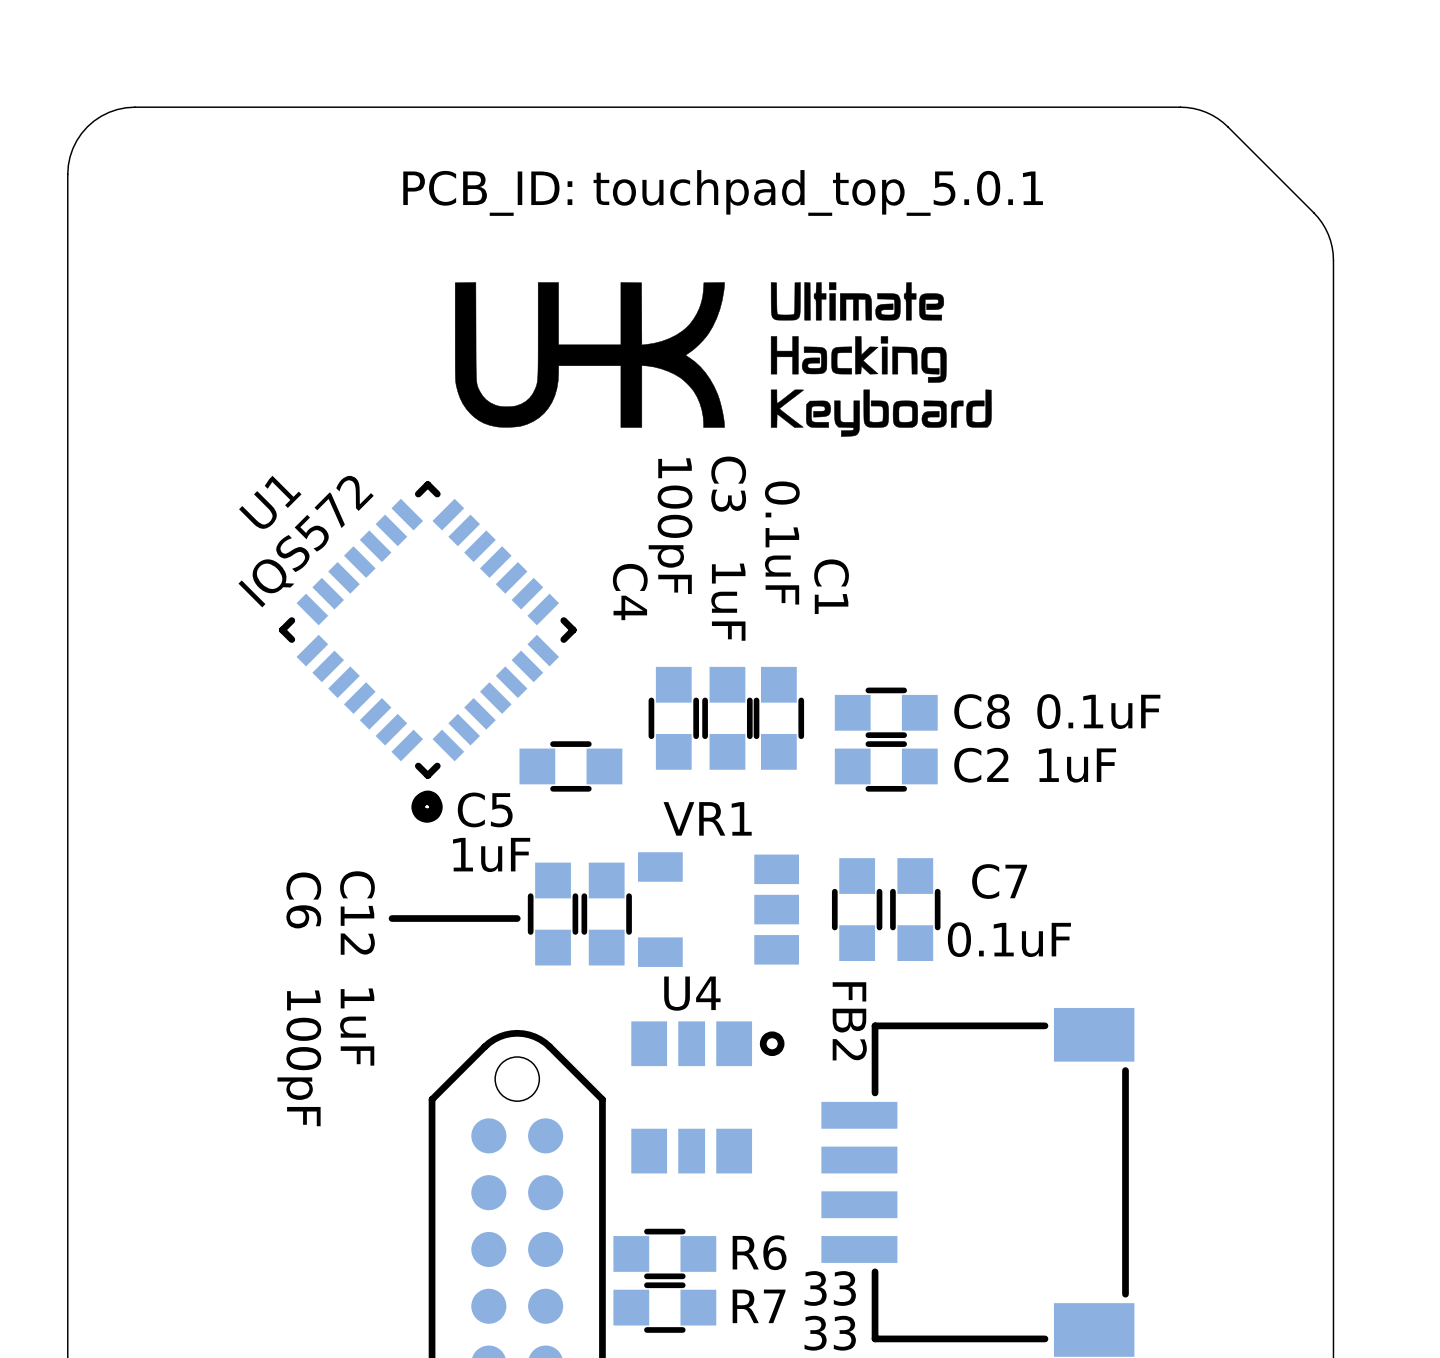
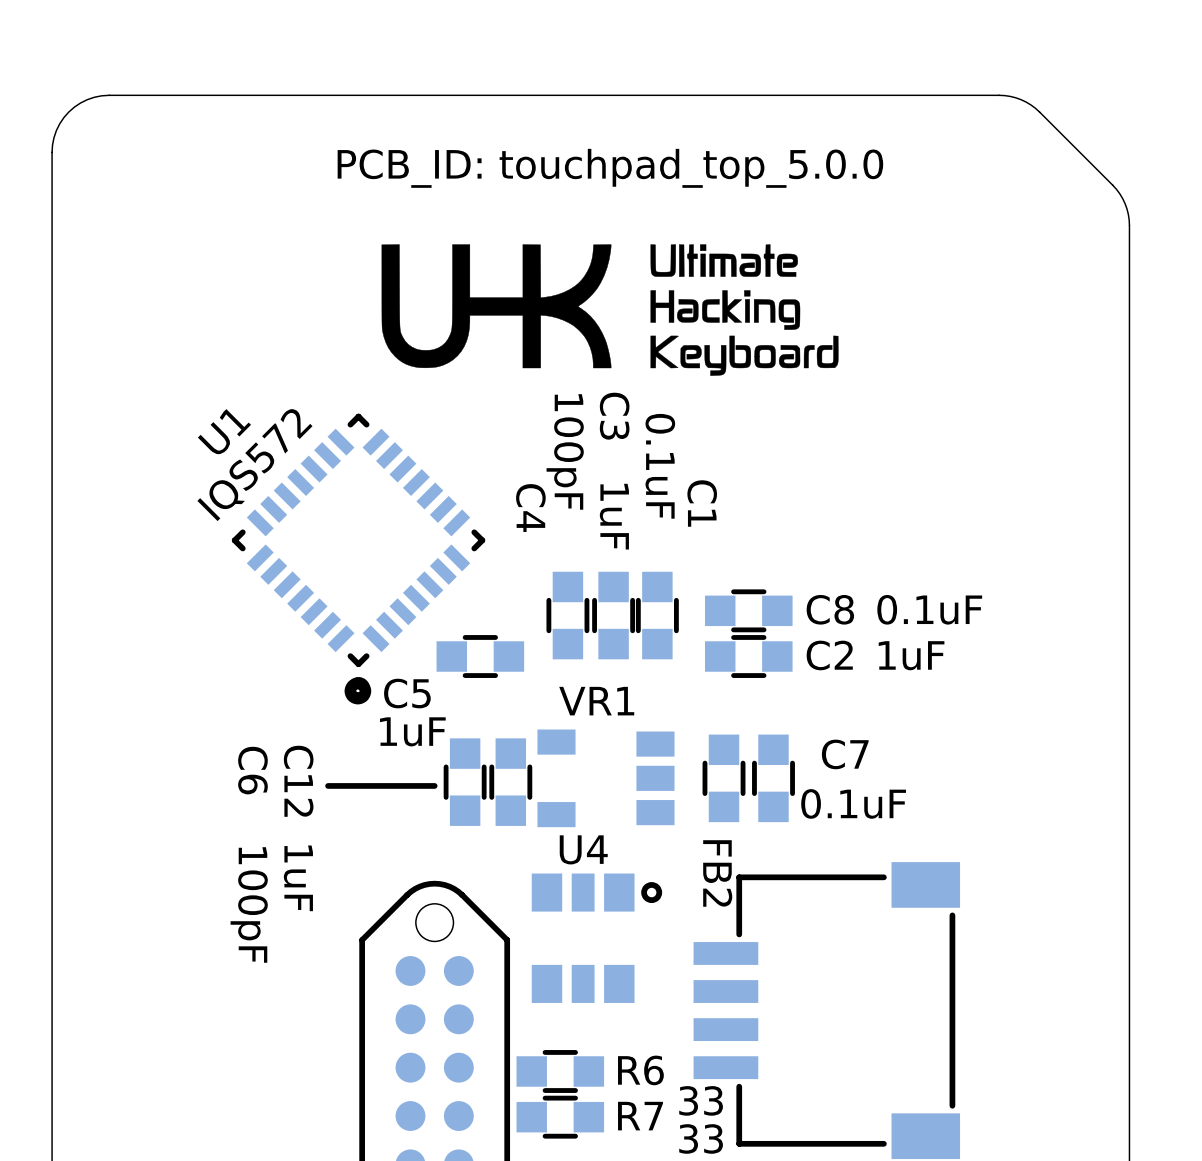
text: PCB_ID: touchpad_top_5.0.1 (723, 192) -> PCB_ID: touchpad_top_5.0.0 (610, 168)

